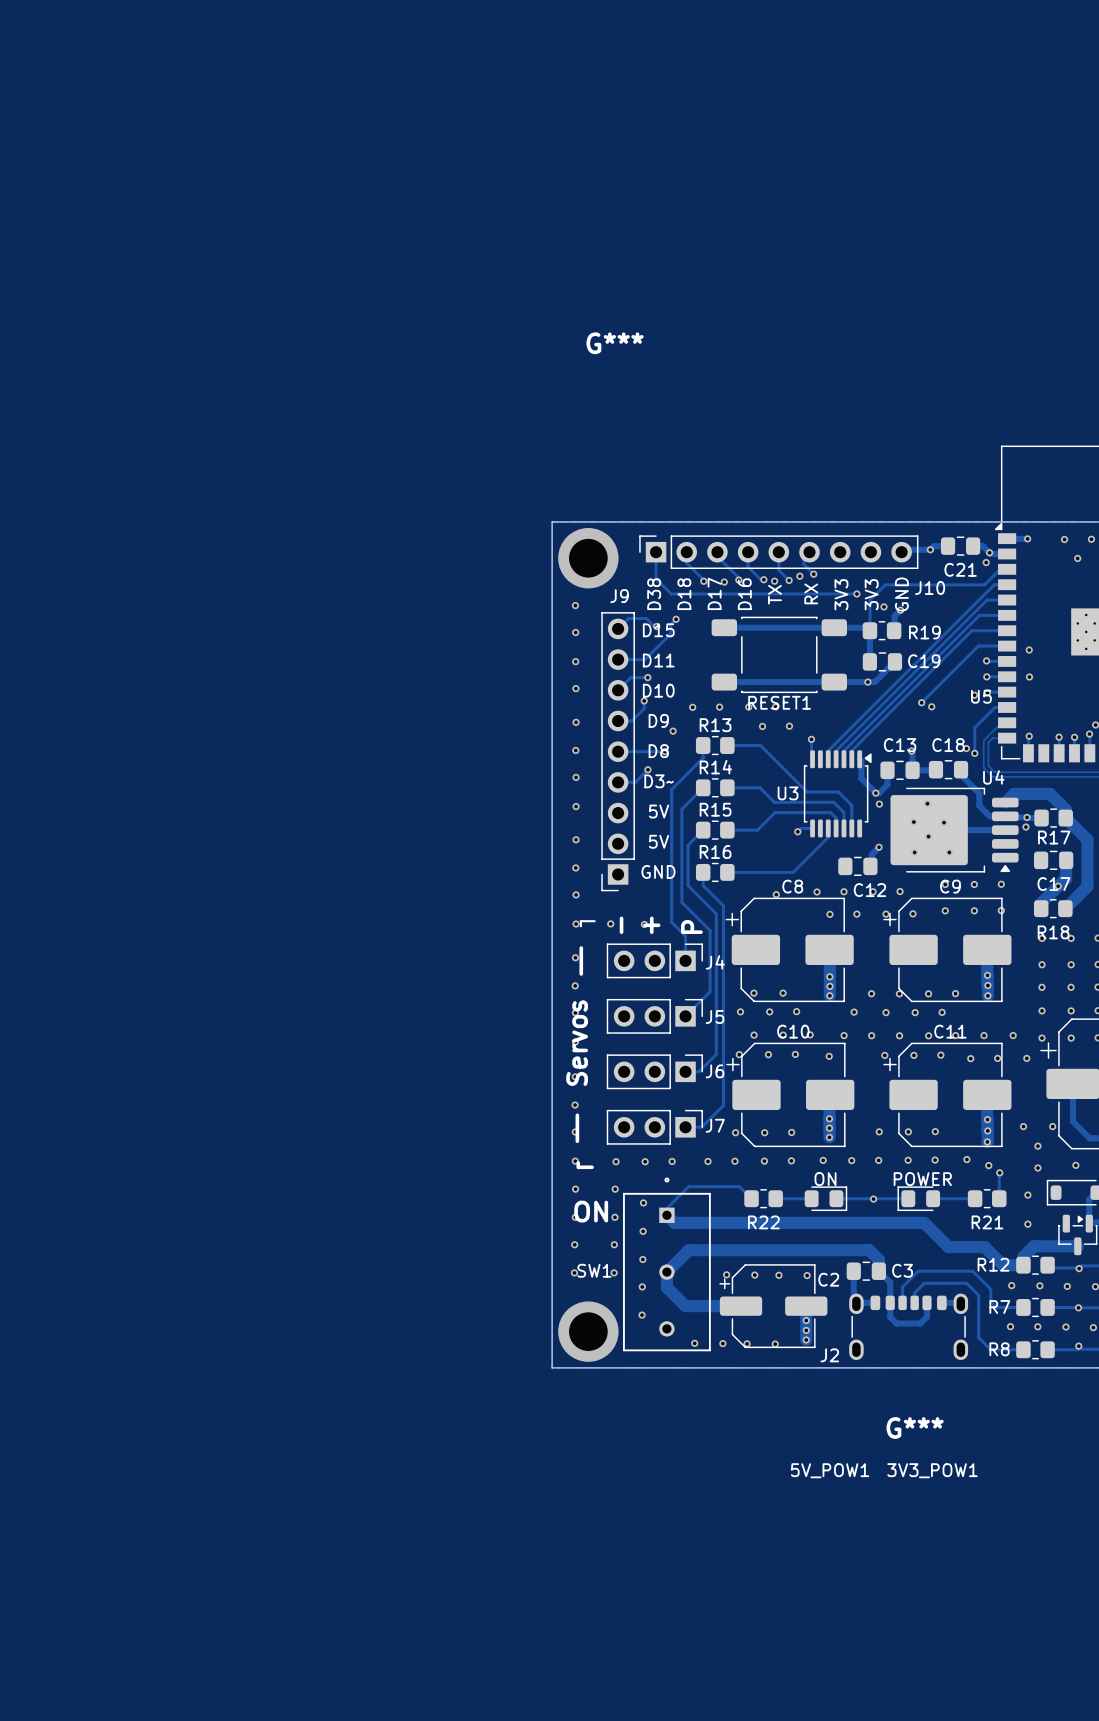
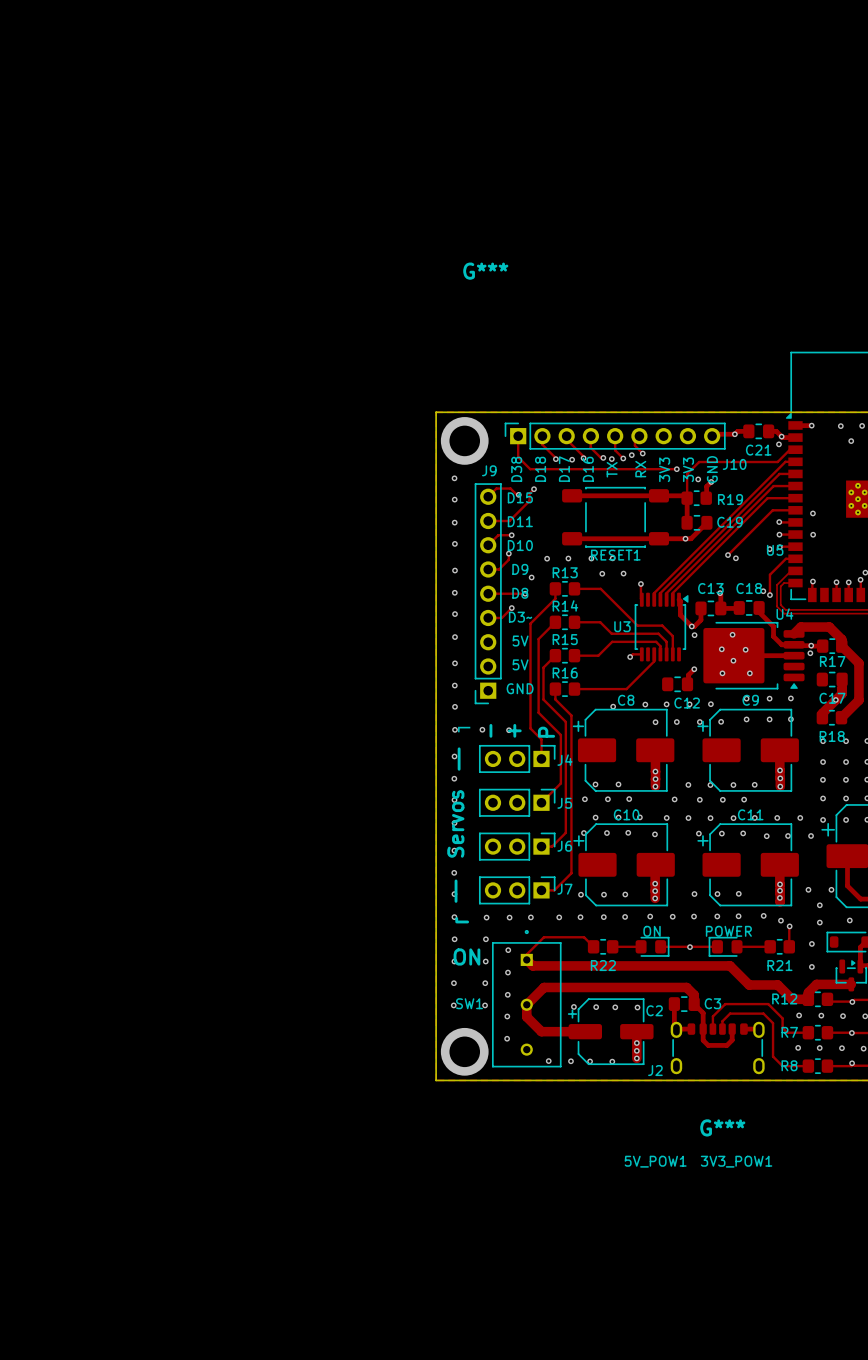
via: none -> (780, 890)
via: (987, 1130) -> none
via: none -> (779, 897)
via: (987, 1141) -> none

